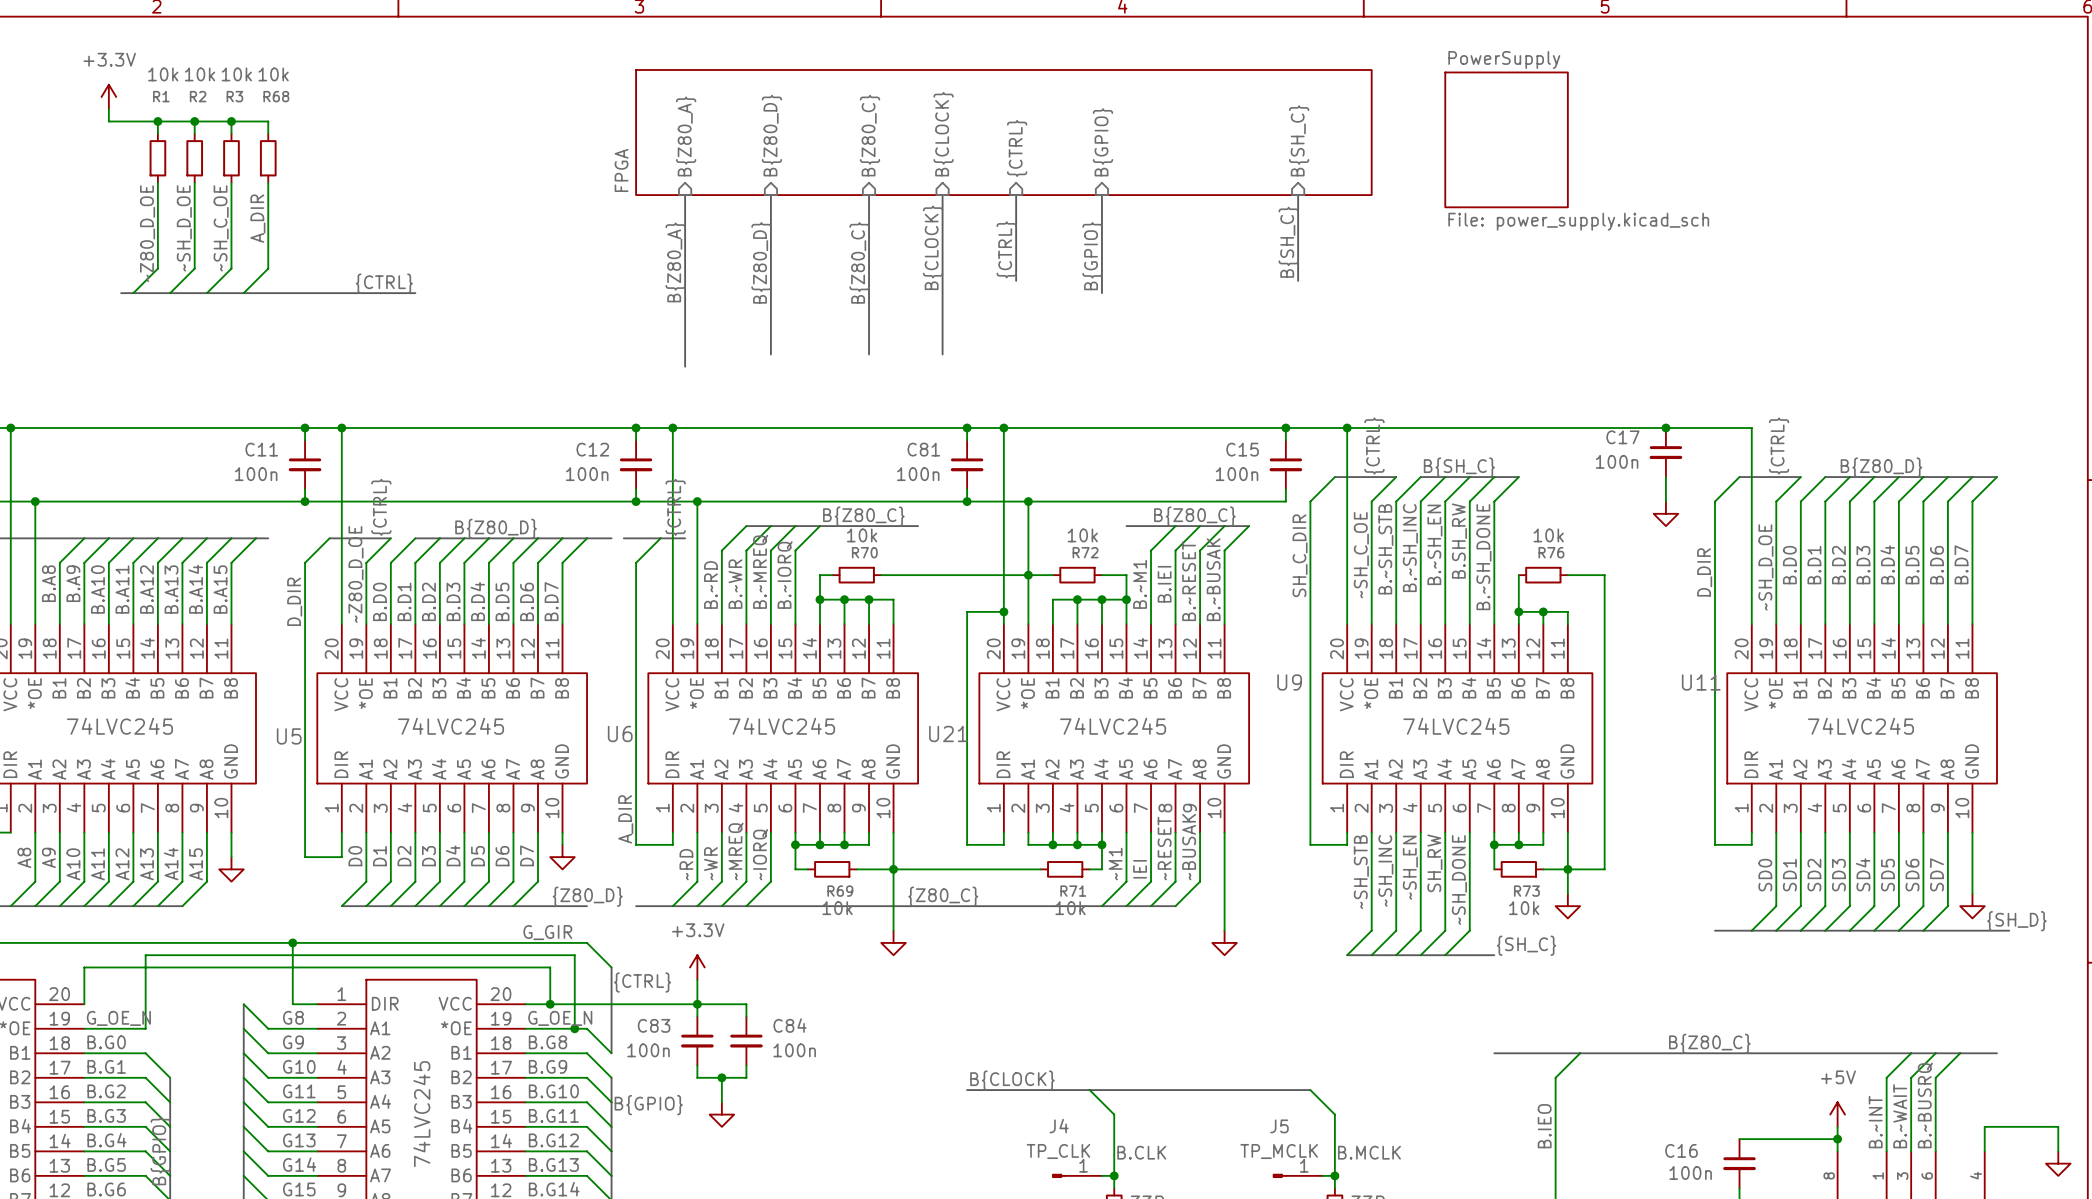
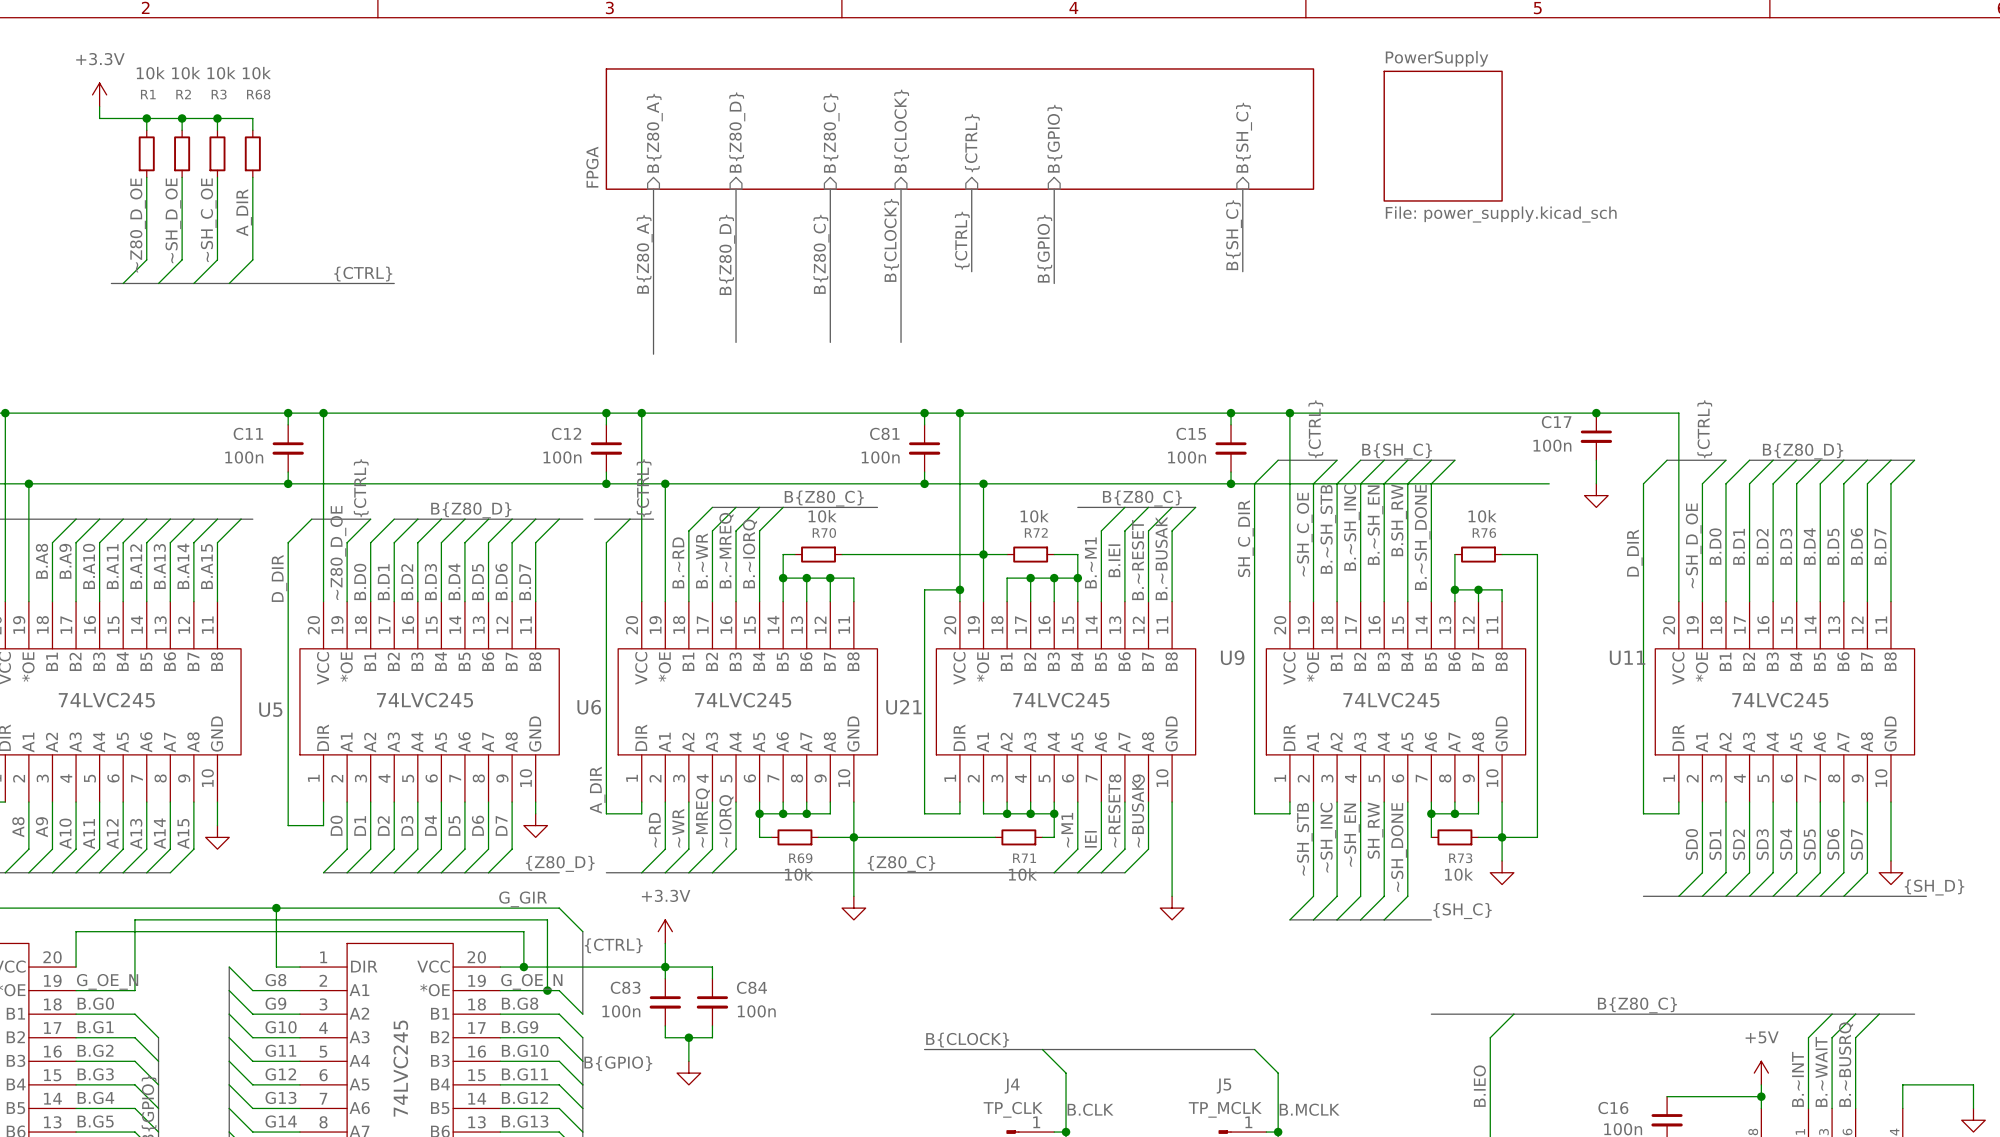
wire: none -> (1231, 483) (1549, 483)
junction: none -> (1231, 483)

